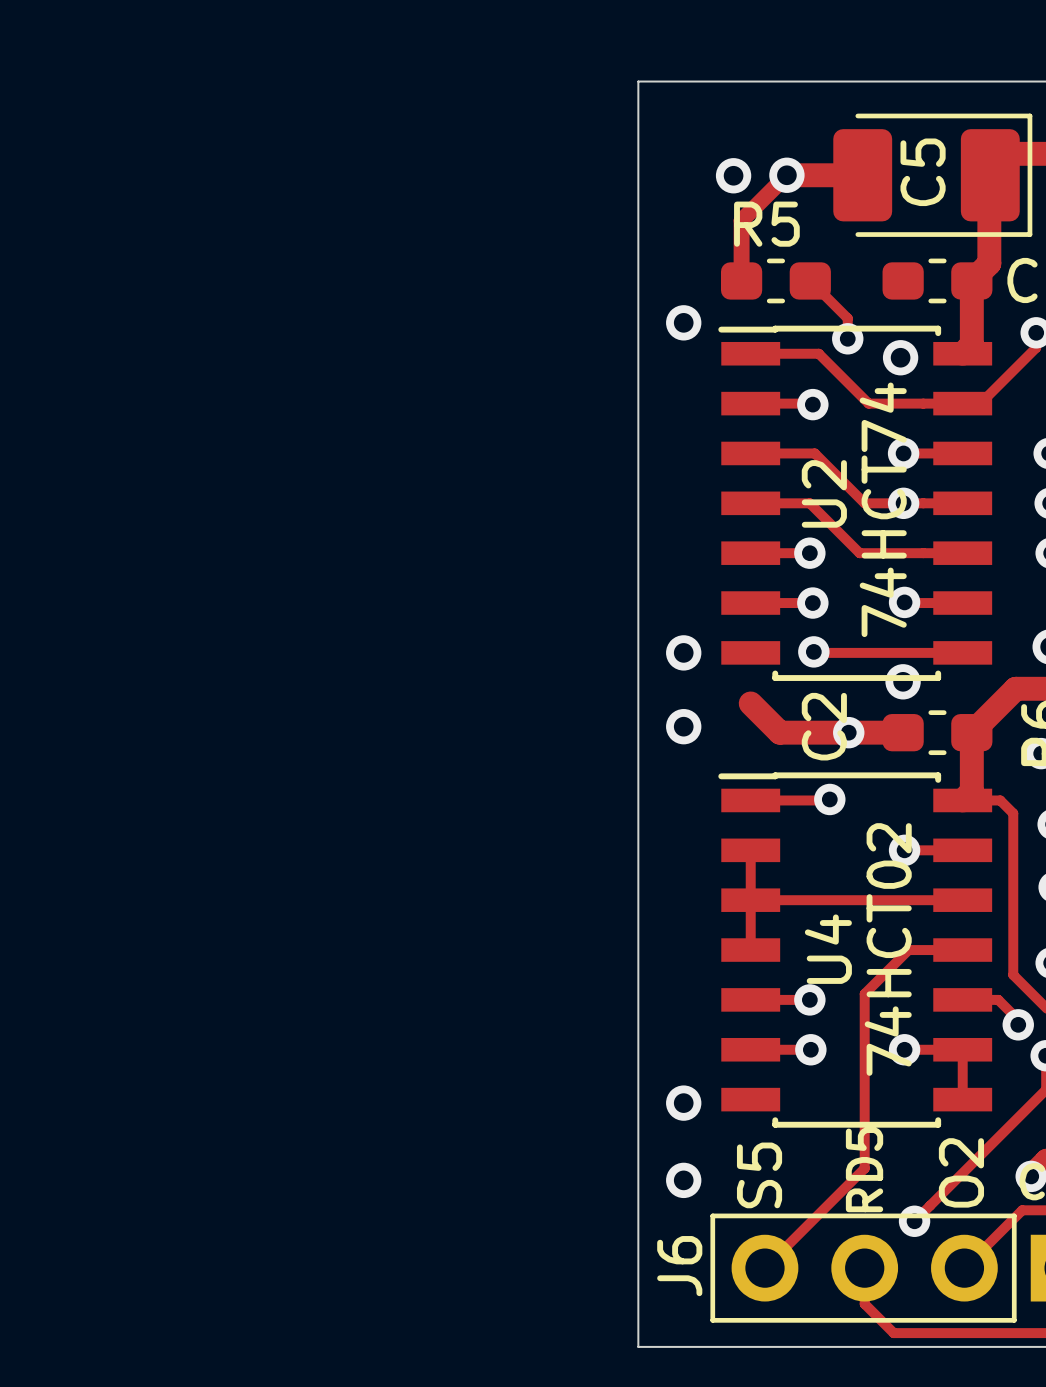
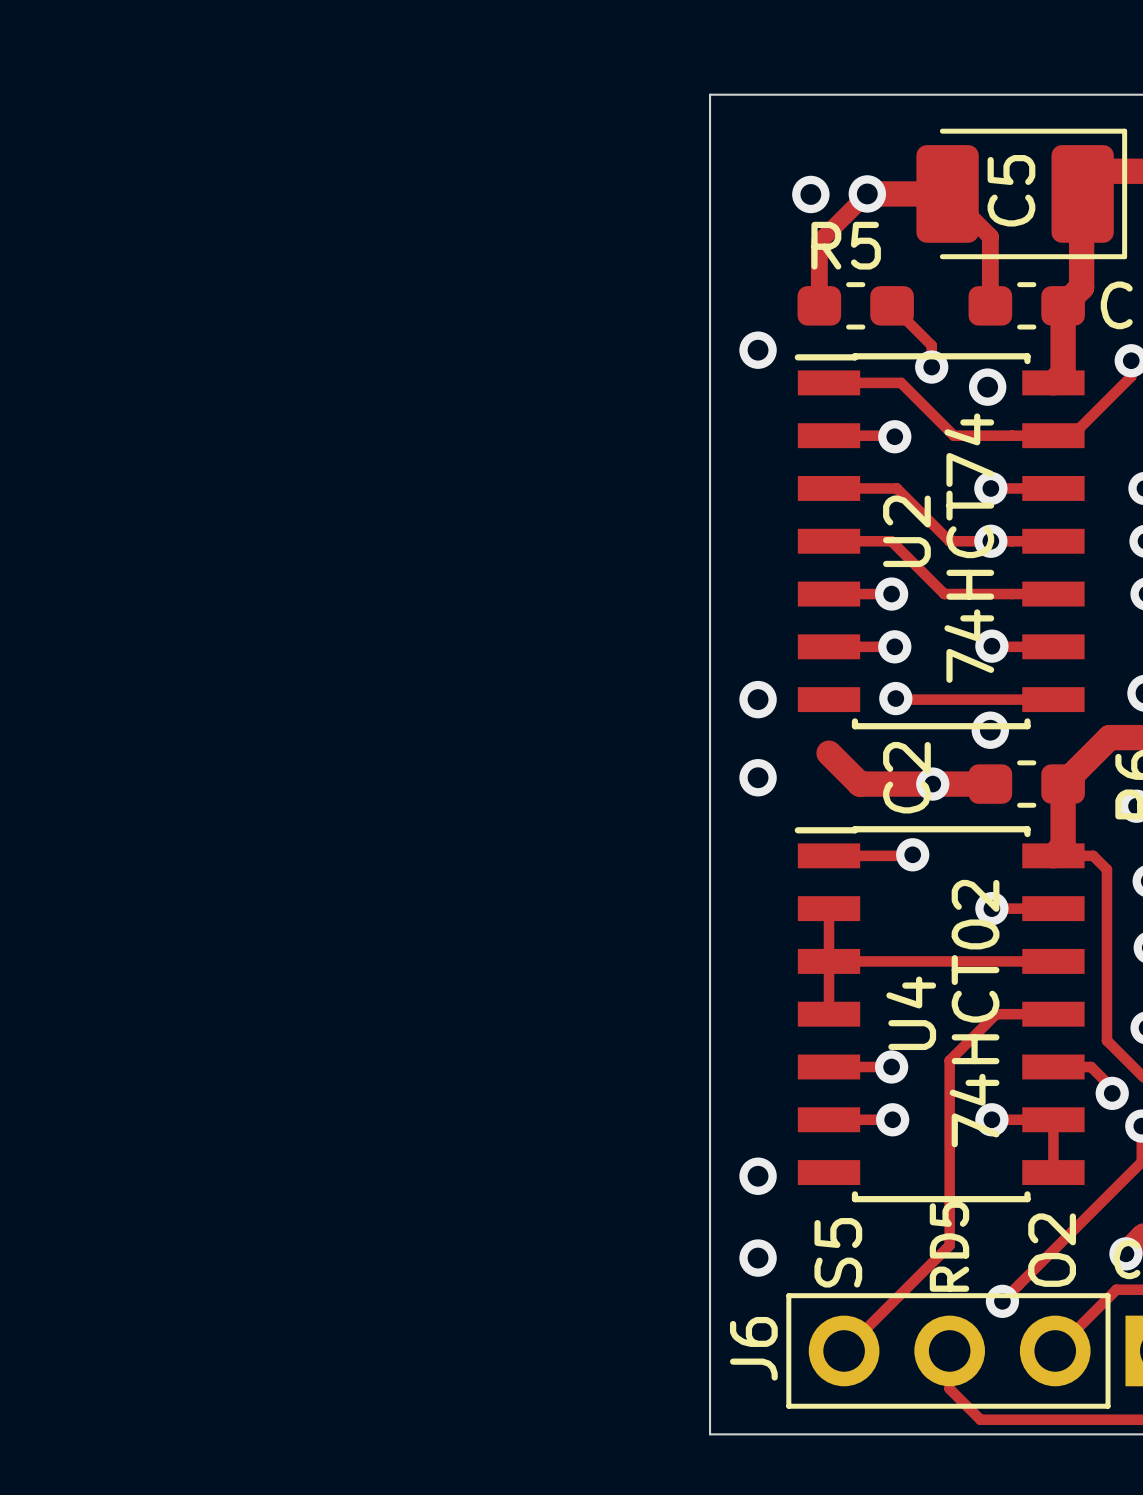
track: none -> (947, 193) (990, 236) (990, 305)

